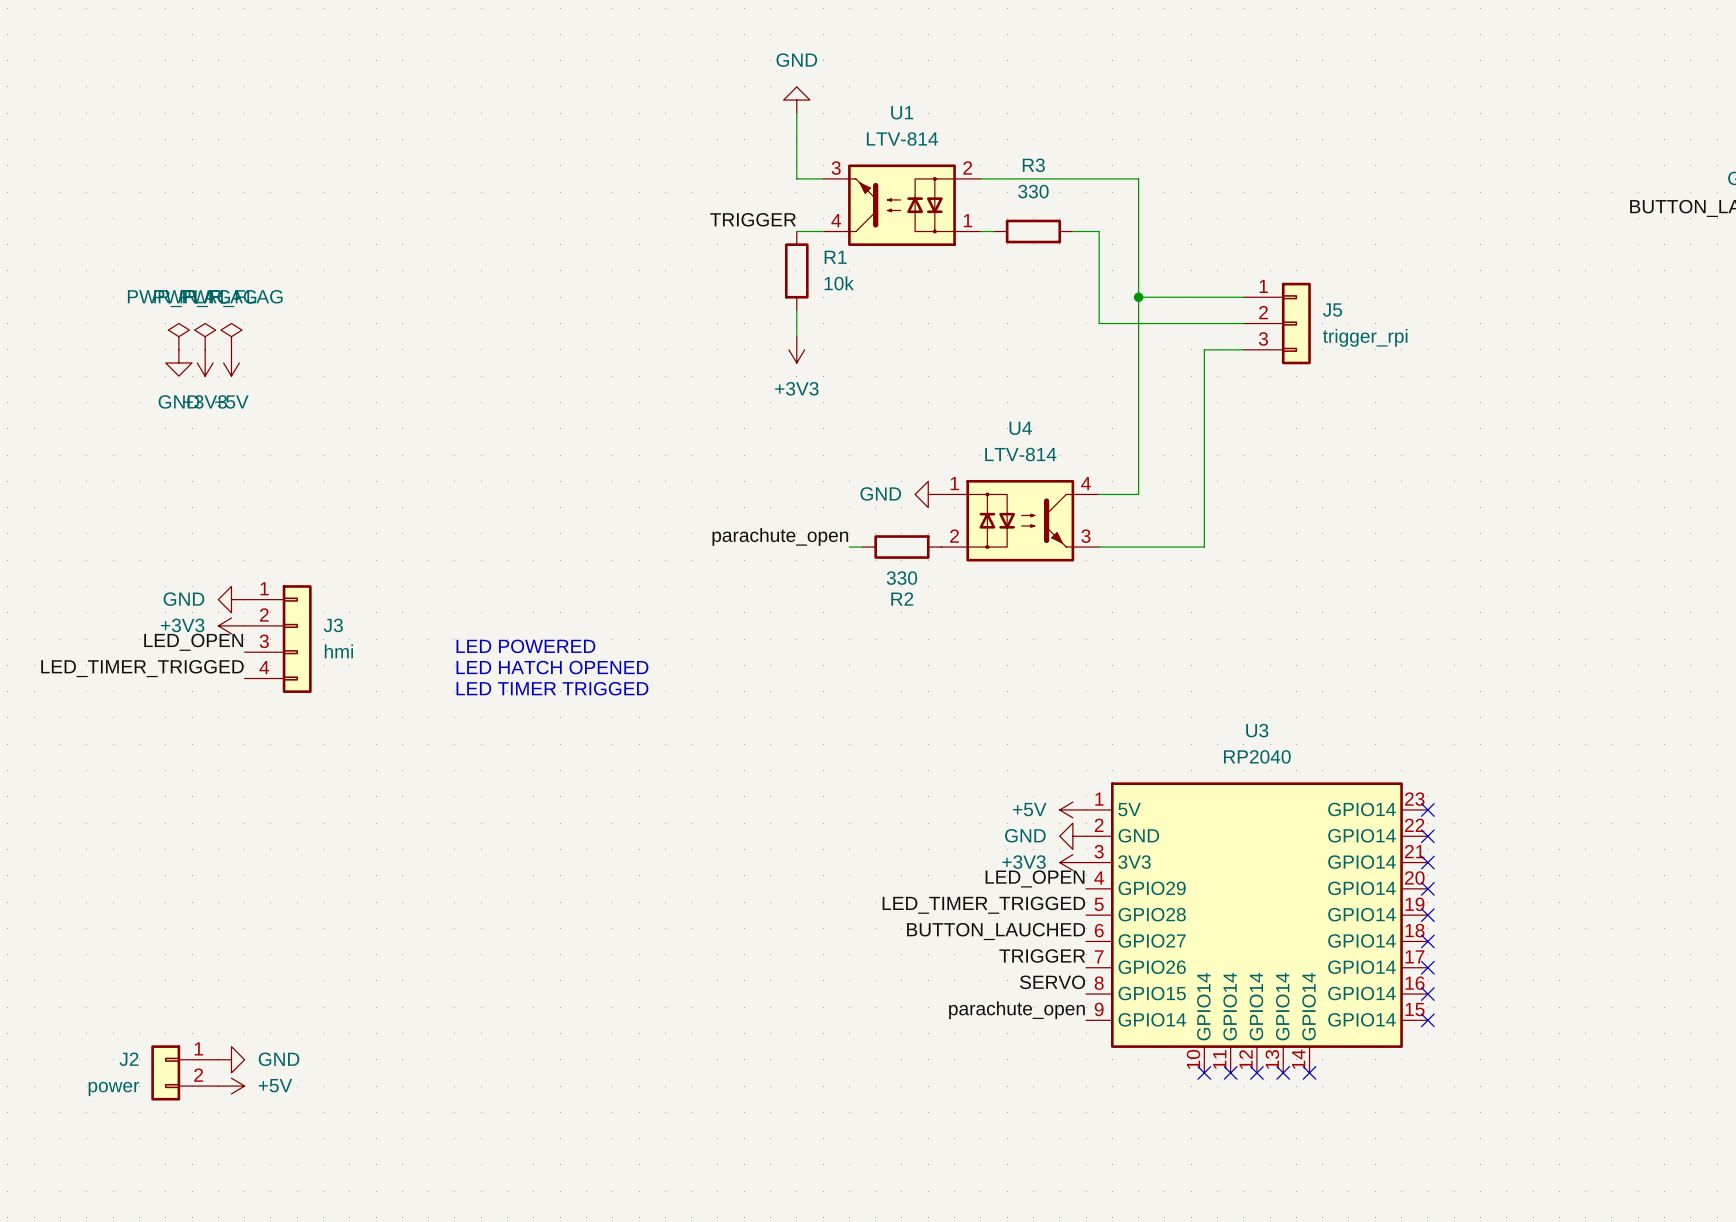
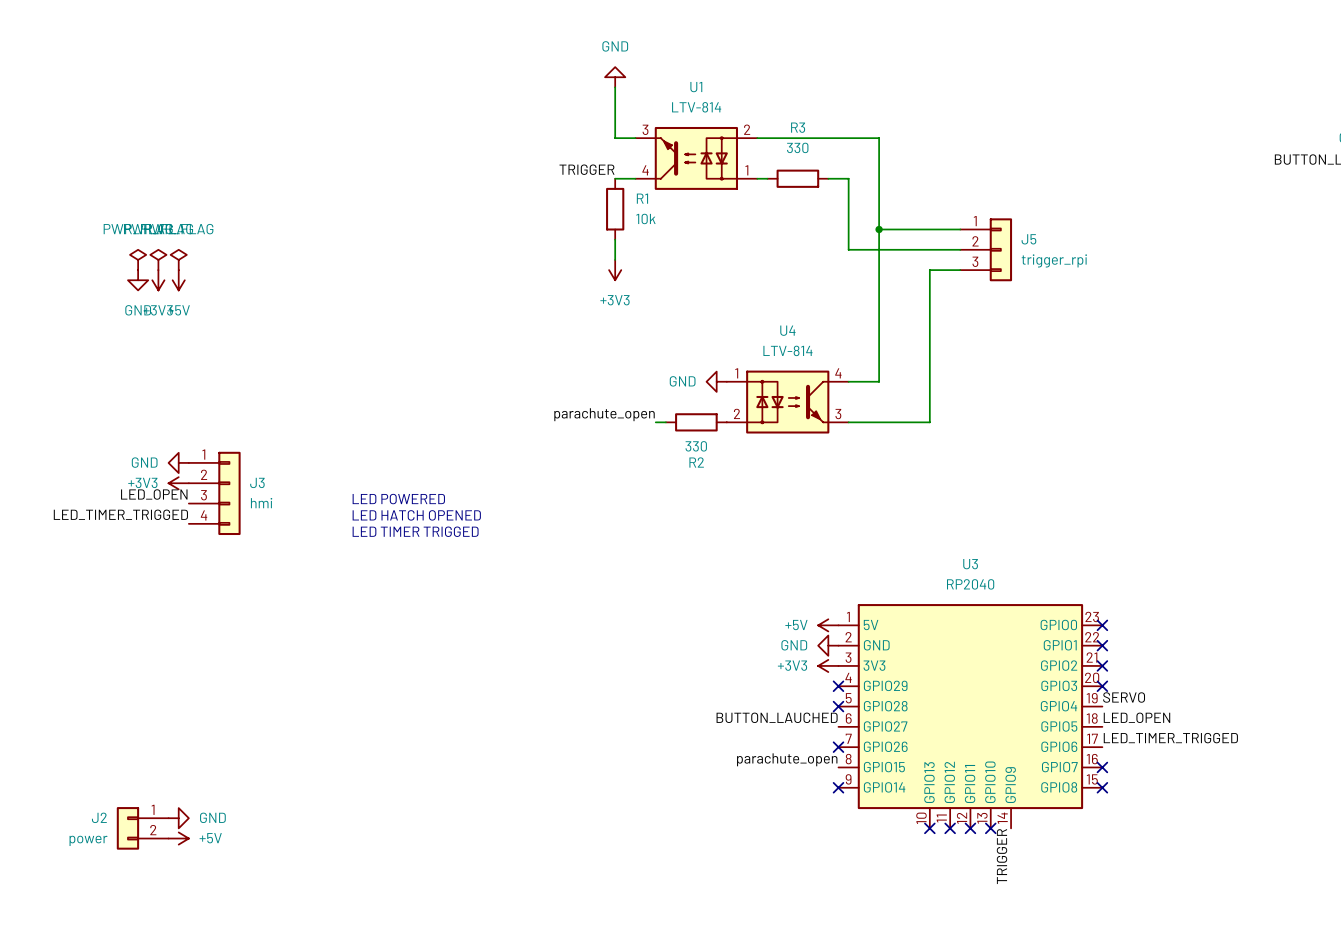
U3 symbol: [1086, 782, 1428, 1073] -> [838, 604, 1103, 829]
label: LED_OPEN (1035, 878) -> none
no-connect mark: none -> (838, 686)
label: none -> SERVO (1124, 697)
label: LED_TIMER_TRIGGED (983, 905) -> none
no-connect mark: none -> (838, 706)
no-connect mark: (1427, 915) -> none
label: none -> LED_OPEN (1136, 717)
no-connect mark: (1427, 941) -> none
label rotation: 0° (1042, 956) -> 90° counterclockwise (1001, 856)
label position: TRIGGER (1042, 956) -> TRIGGER (1001, 856)
label: none -> LED_TIMER_TRIGGED (1170, 738)
no-connect mark: none -> (838, 747)
no-connect mark: (1427, 967) -> none
label: SERVO (1052, 982) -> parachute_open (787, 759)
label: parachute_open (1016, 1010) -> none
no-connect mark: none -> (838, 787)
no-connect mark: (1309, 1072) -> none

